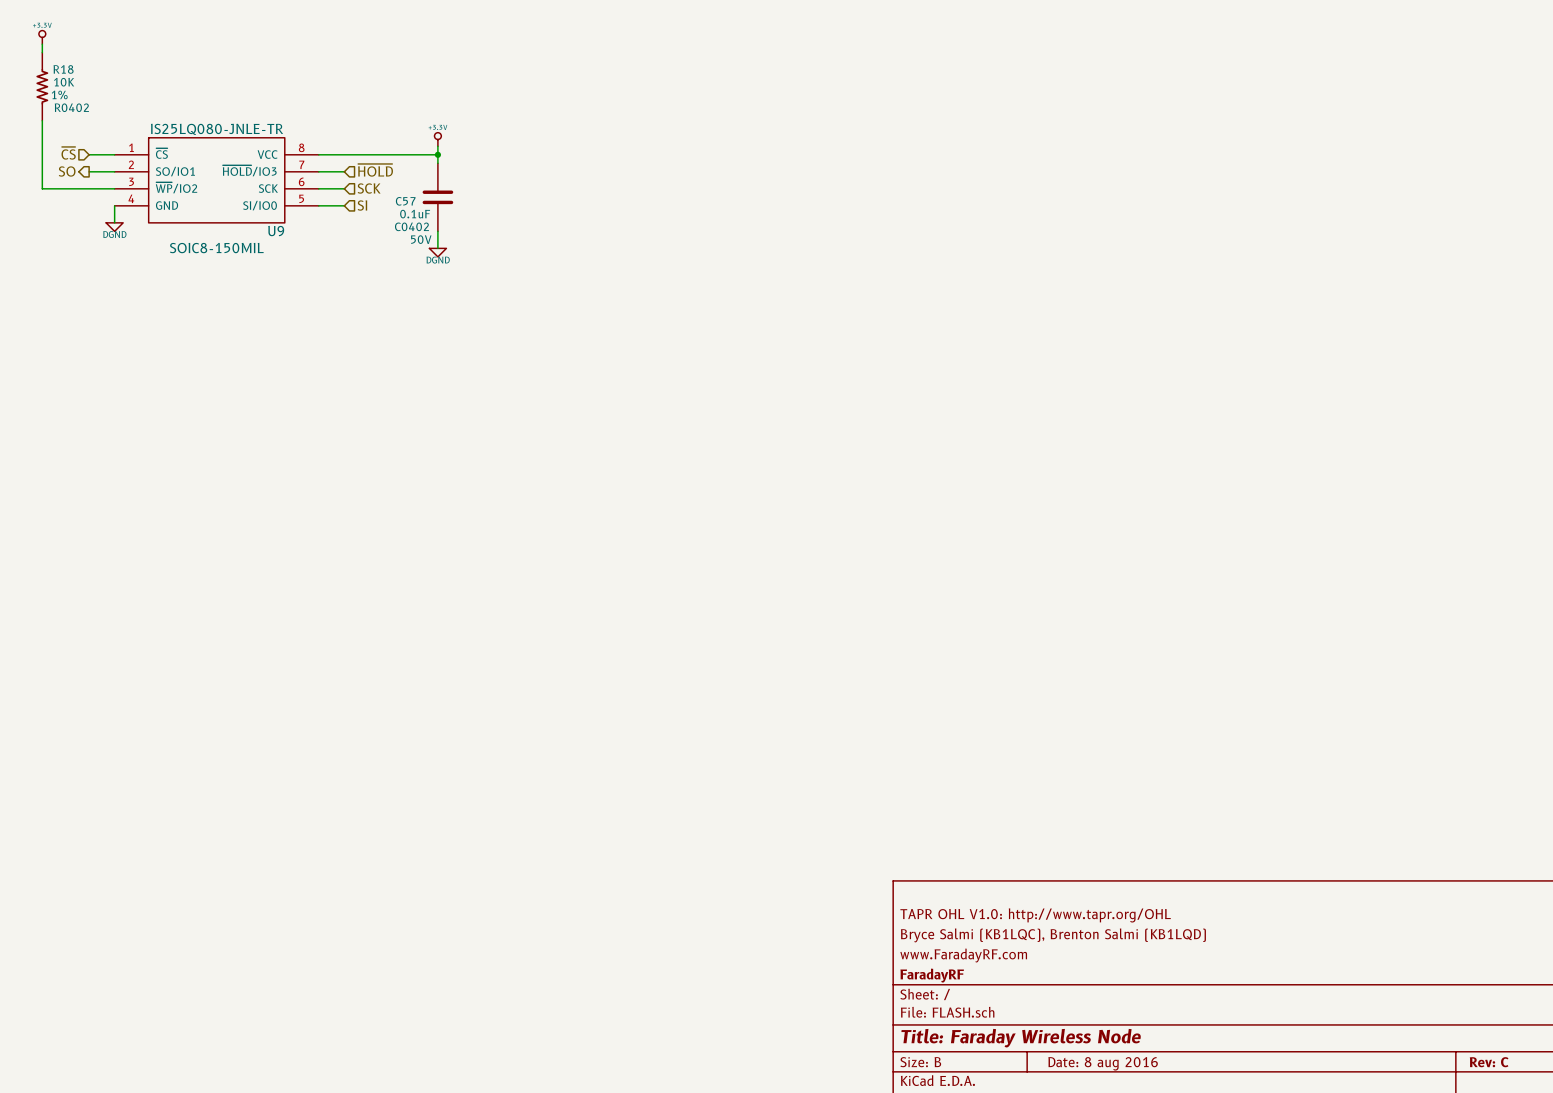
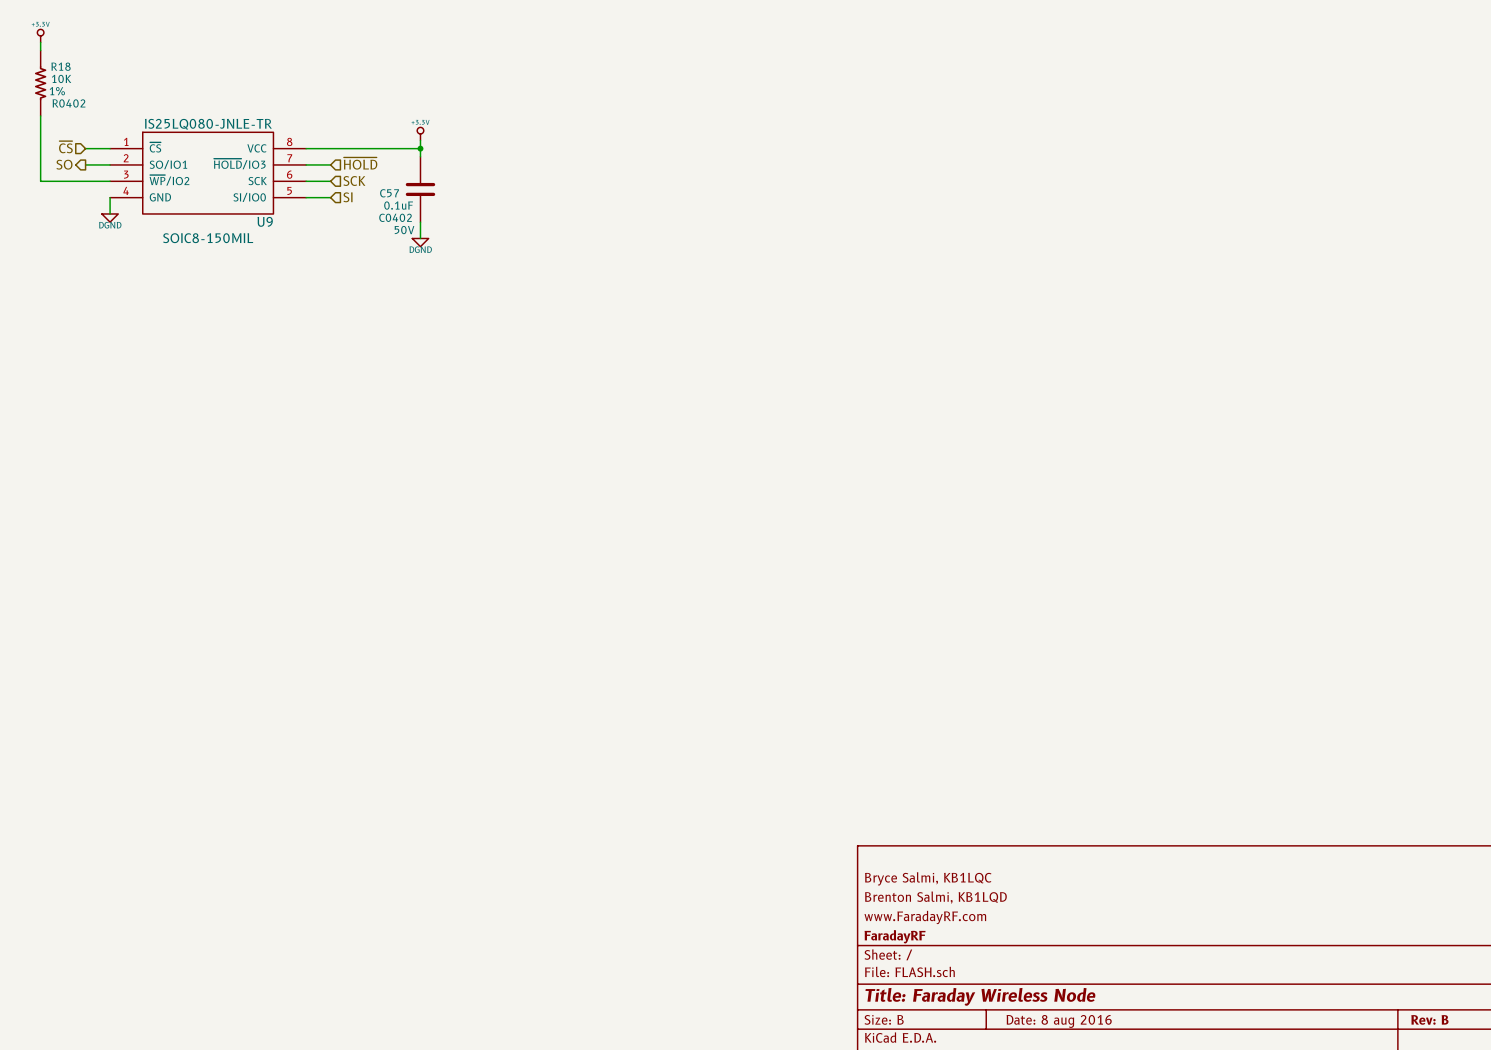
title block: TAPR OHL V1.0: http://www.tapr.org/OHL (1035, 915) -> Bryce Salmi, KB1LQC (928, 878)
title block: Bryce Salmi (KB1LQC), Brenton Salmi (KB1LQD) (1053, 935) -> Brenton Salmi, KB1LQD (935, 897)
title block: Rev: C (1489, 1062) -> Rev: B (1429, 1019)

